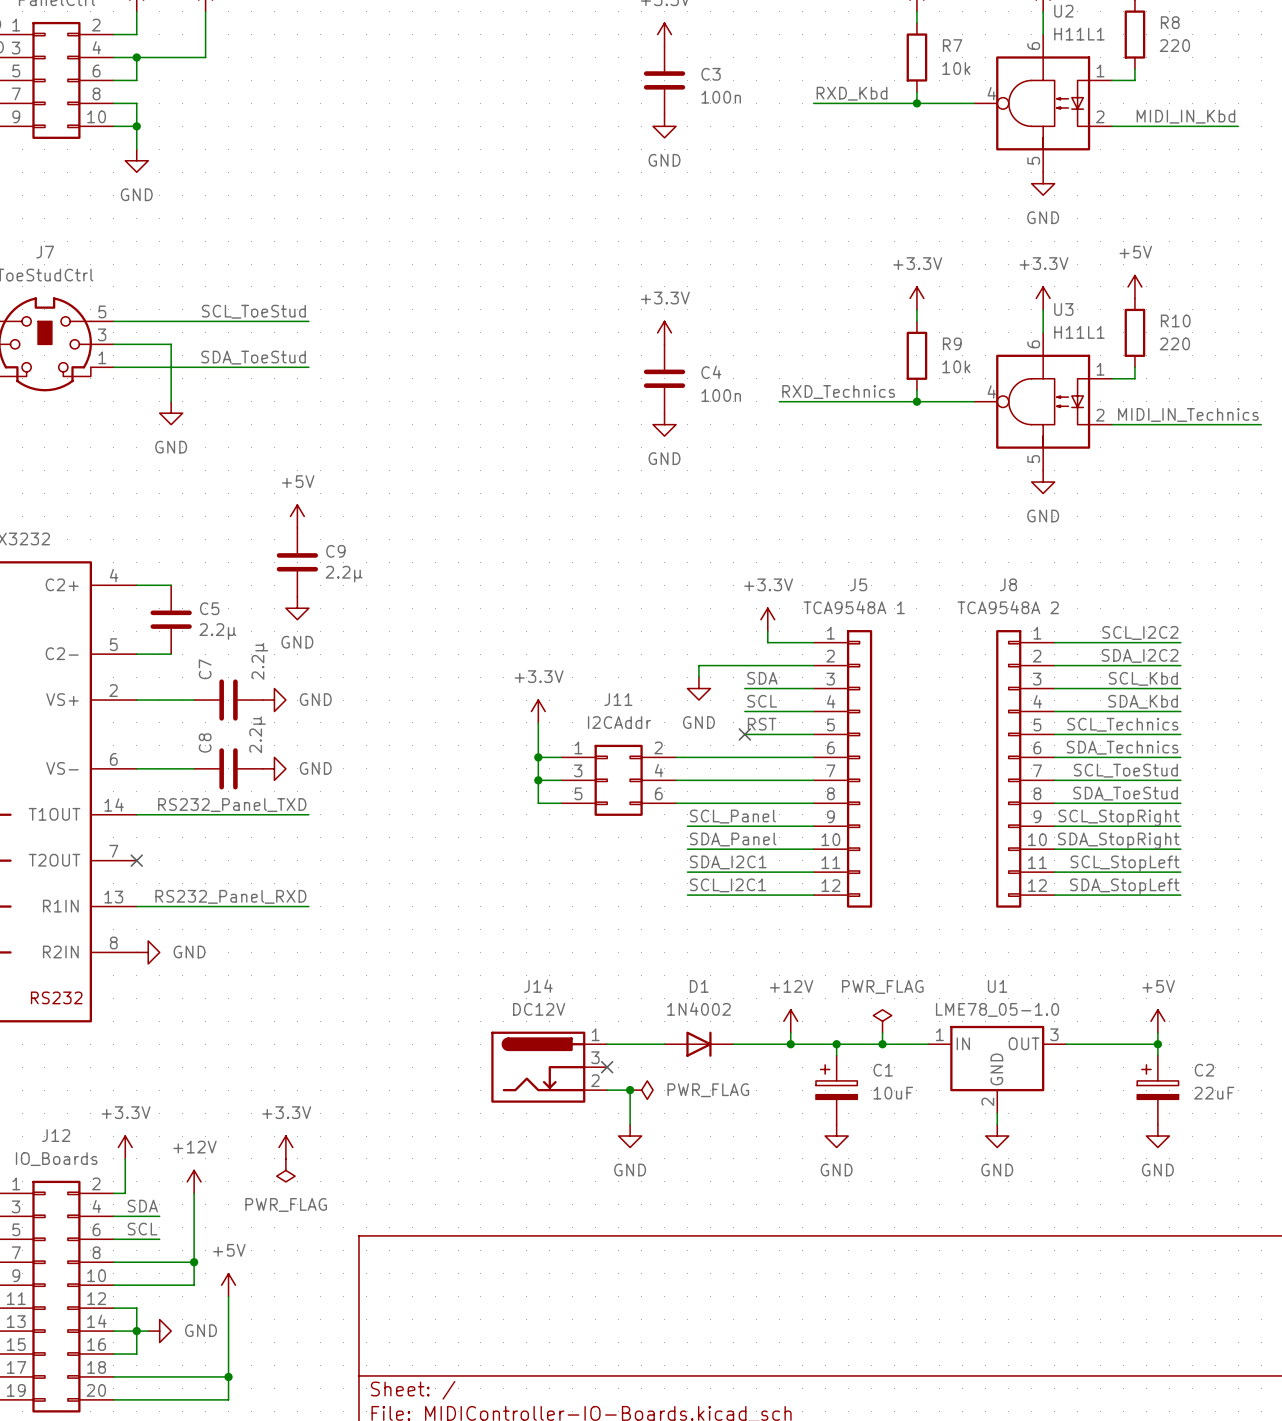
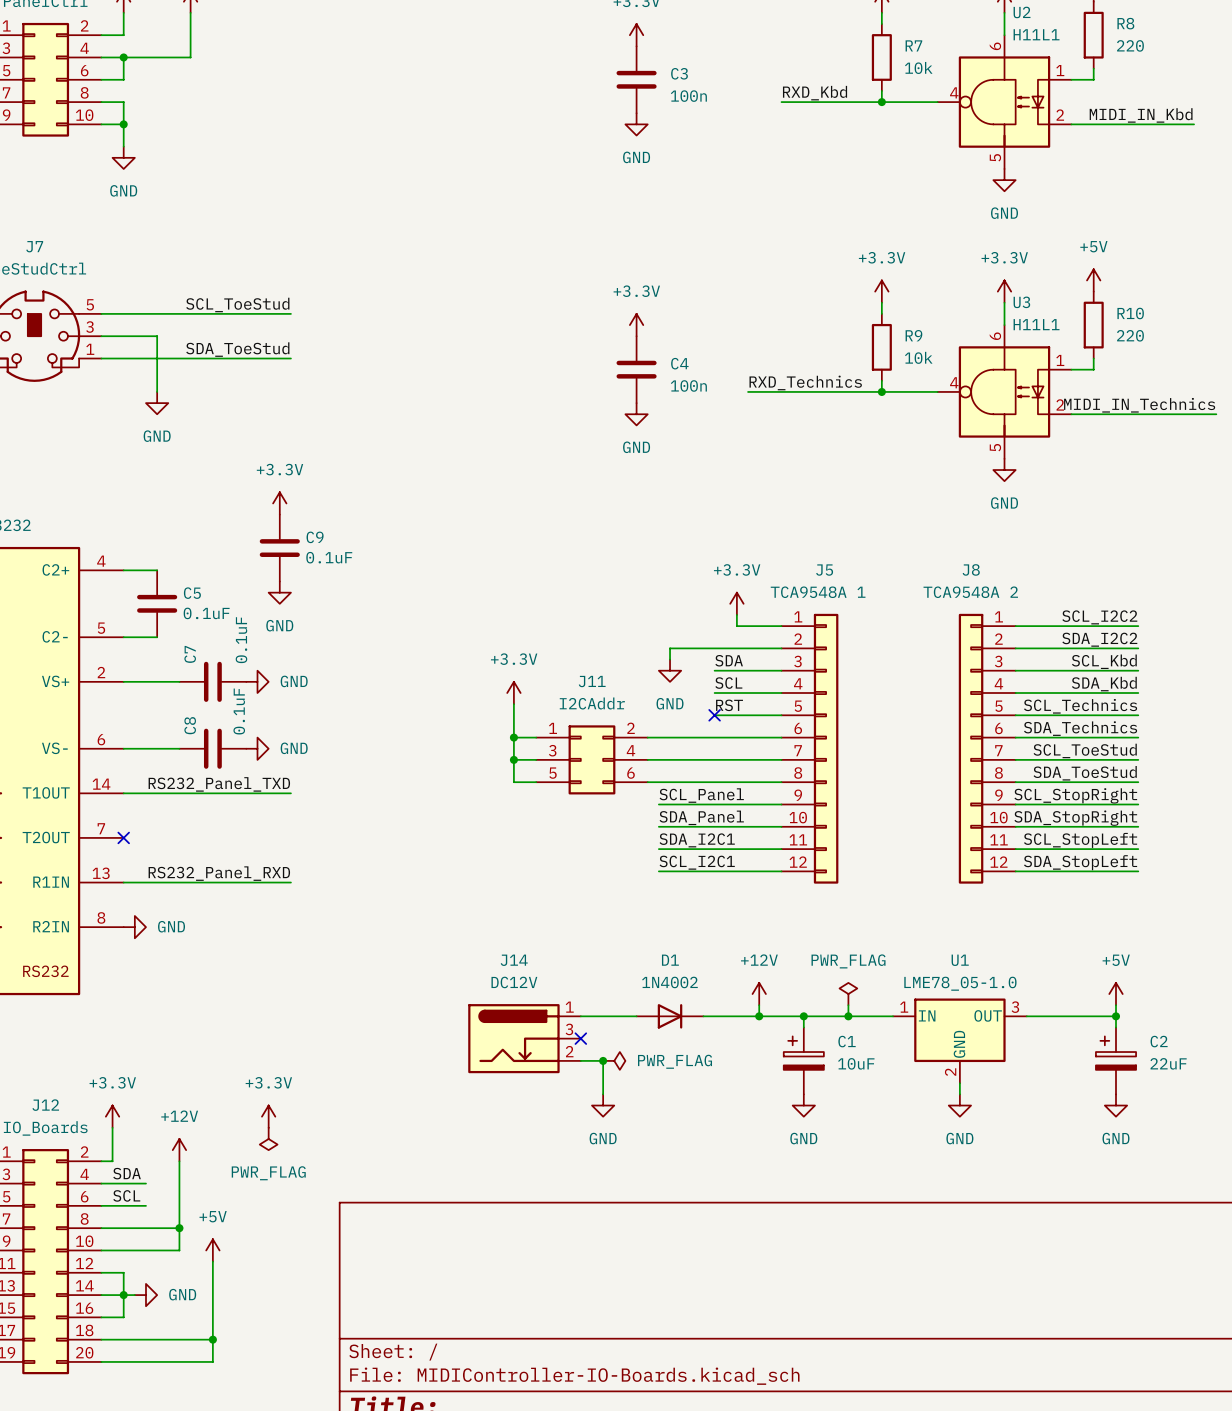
power symbol: +5V (297, 516) -> +3.3V (279, 503)
C9 value: 2.2µ (344, 574) -> 0.1uF (329, 557)
C5 value: 2.2µ (217, 631) -> 0.1uF (206, 613)
C7 value: 2.2µ (259, 661) -> 0.1uF (241, 640)
C8 value: 2.2µ (257, 734) -> 0.1uF (239, 711)

